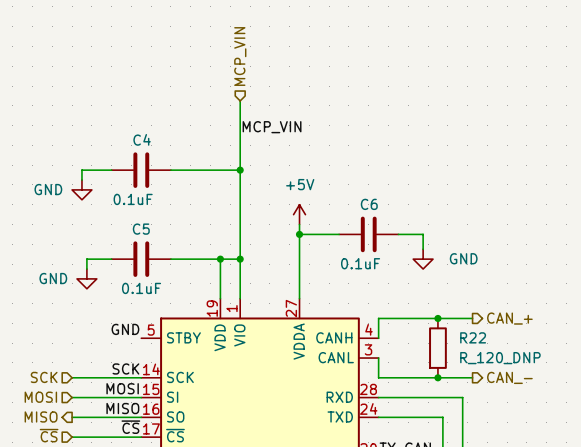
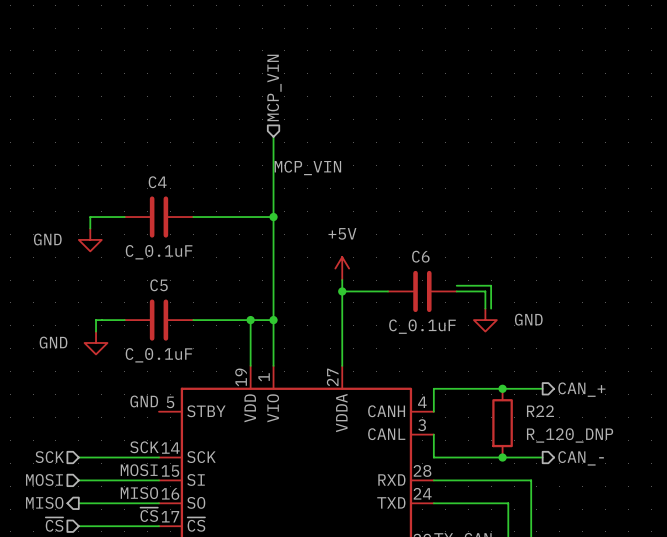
C4 value: 0.1uF (133, 199) -> C_0.1uF (159, 252)
wire: none -> (456, 285) (491, 285) (491, 308)
C6 value: 0.1uF (360, 263) -> C_0.1uF (422, 326)
C5 value: 0.1uF (141, 288) -> C_0.1uF (159, 355)

